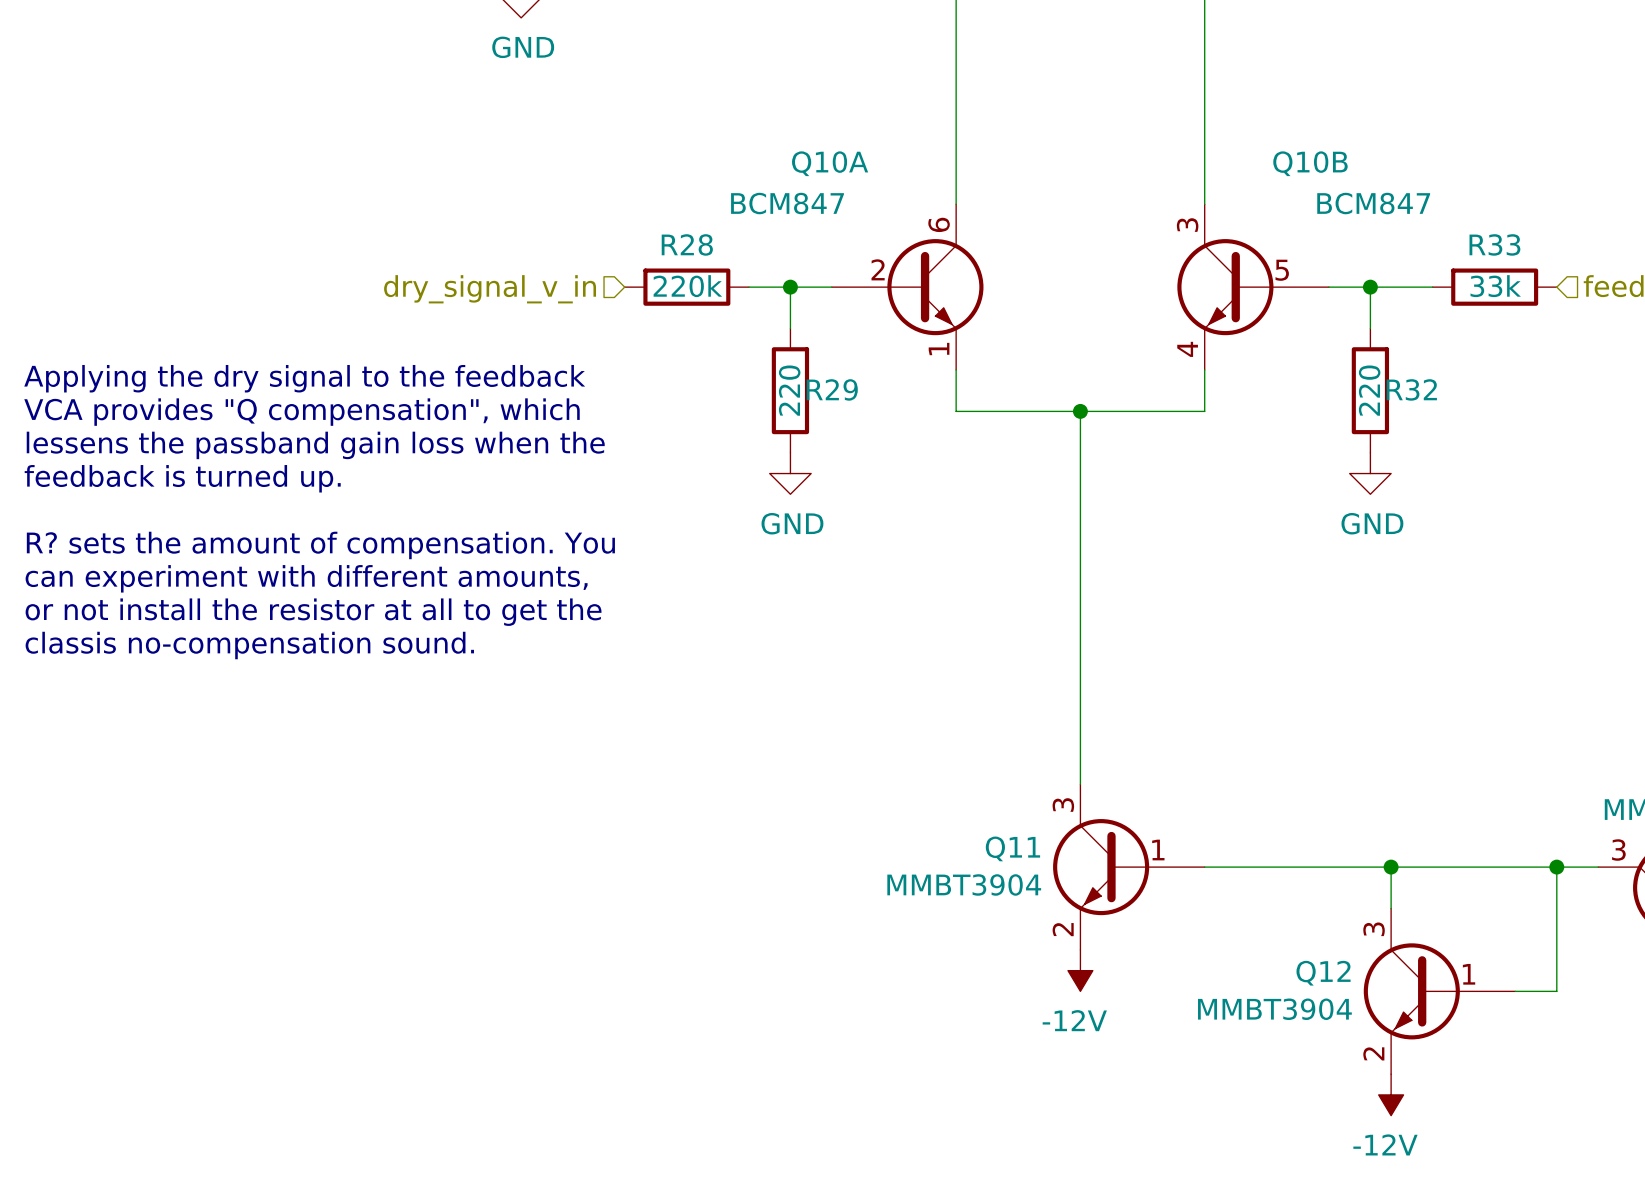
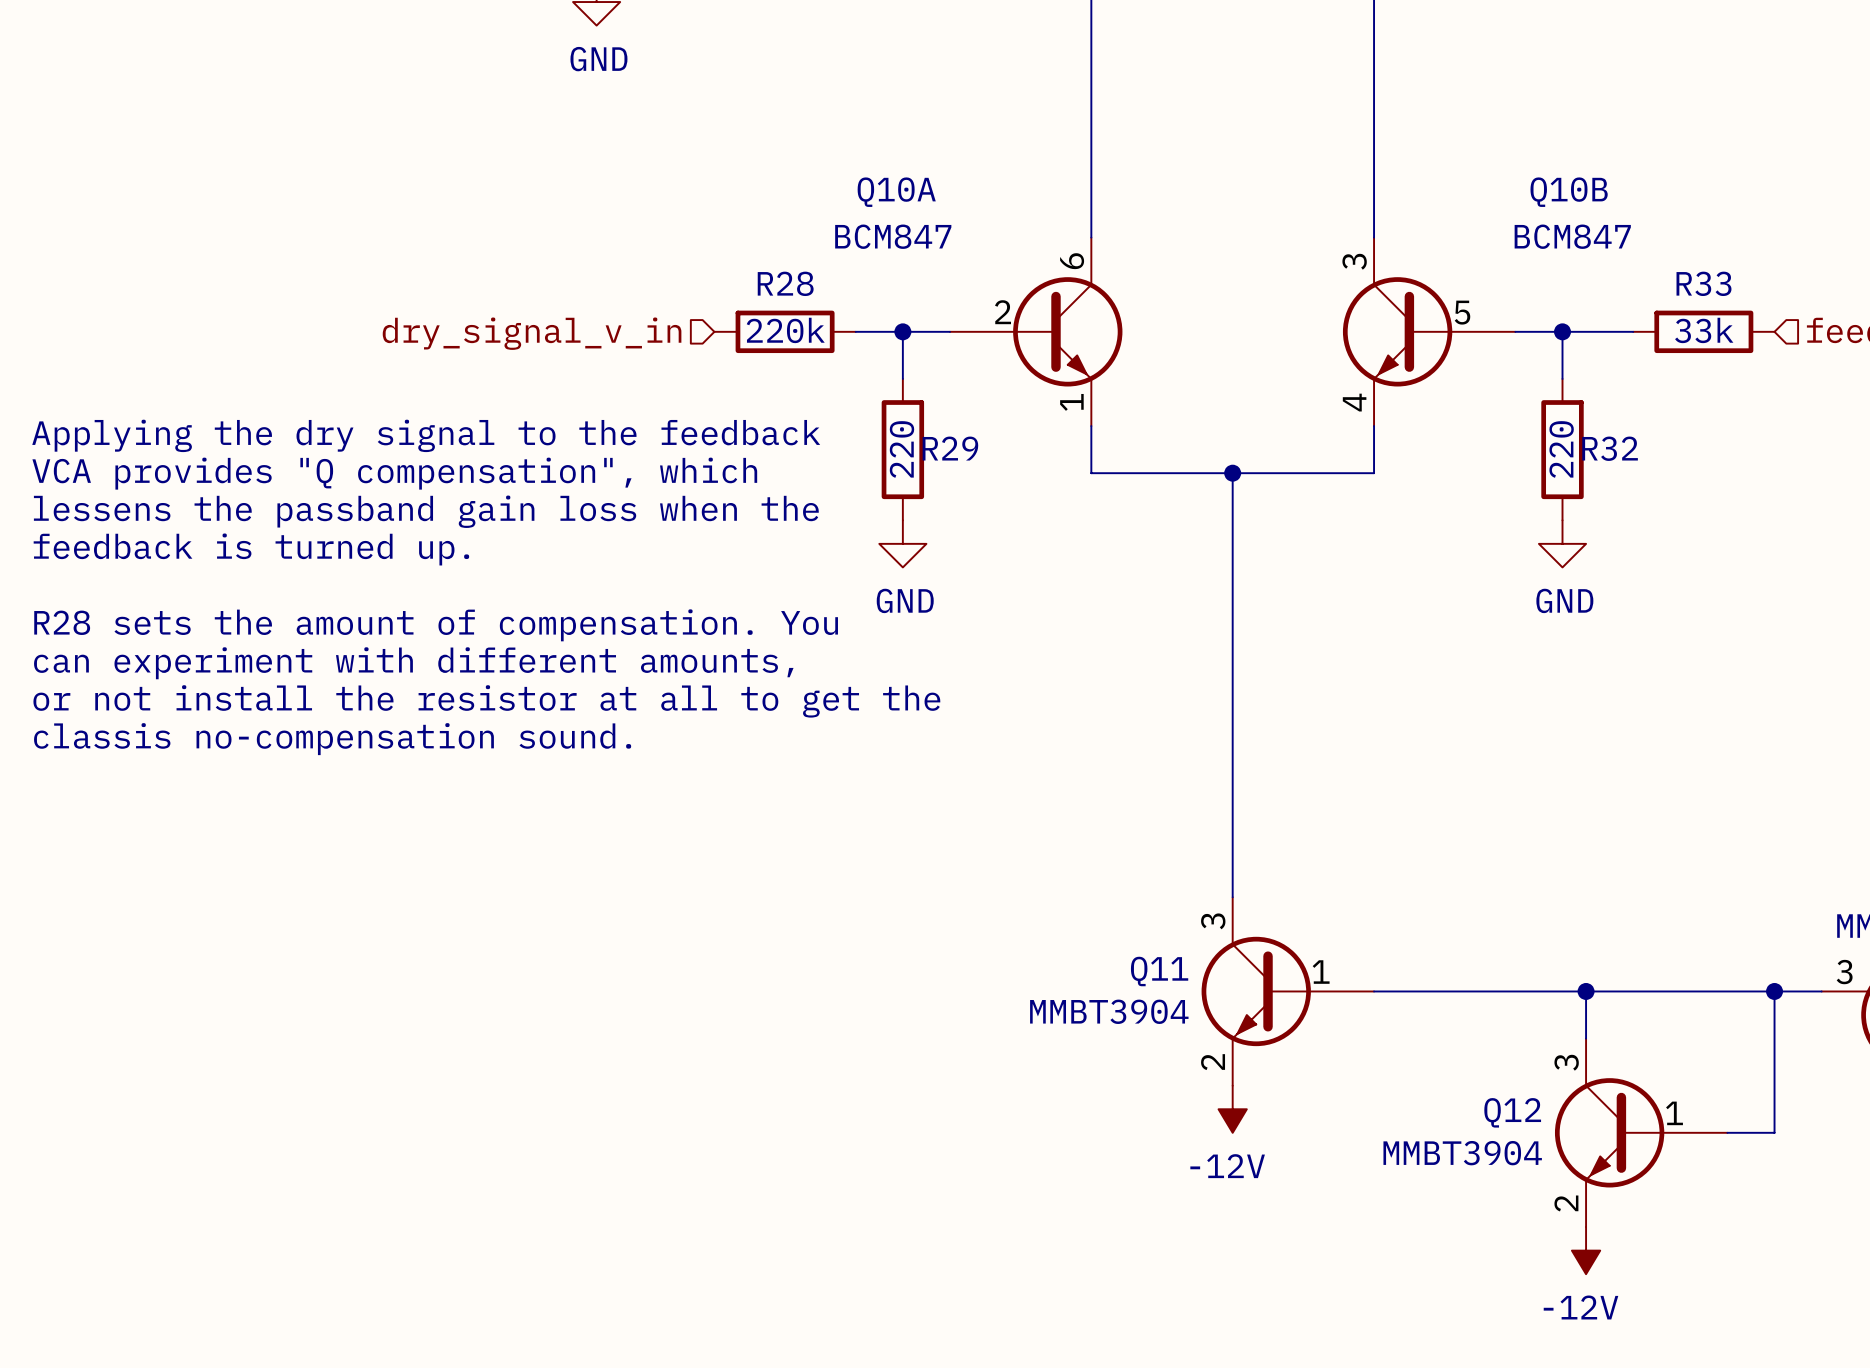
Q10A name position: Q10A (830, 163) -> Q10A (896, 192)
Q10B name position: Q10B (1310, 163) -> Q10B (1569, 192)
text: R? sets the amount of compensation. You (320, 545) -> R28 sets the amount of compensation. You (436, 625)

